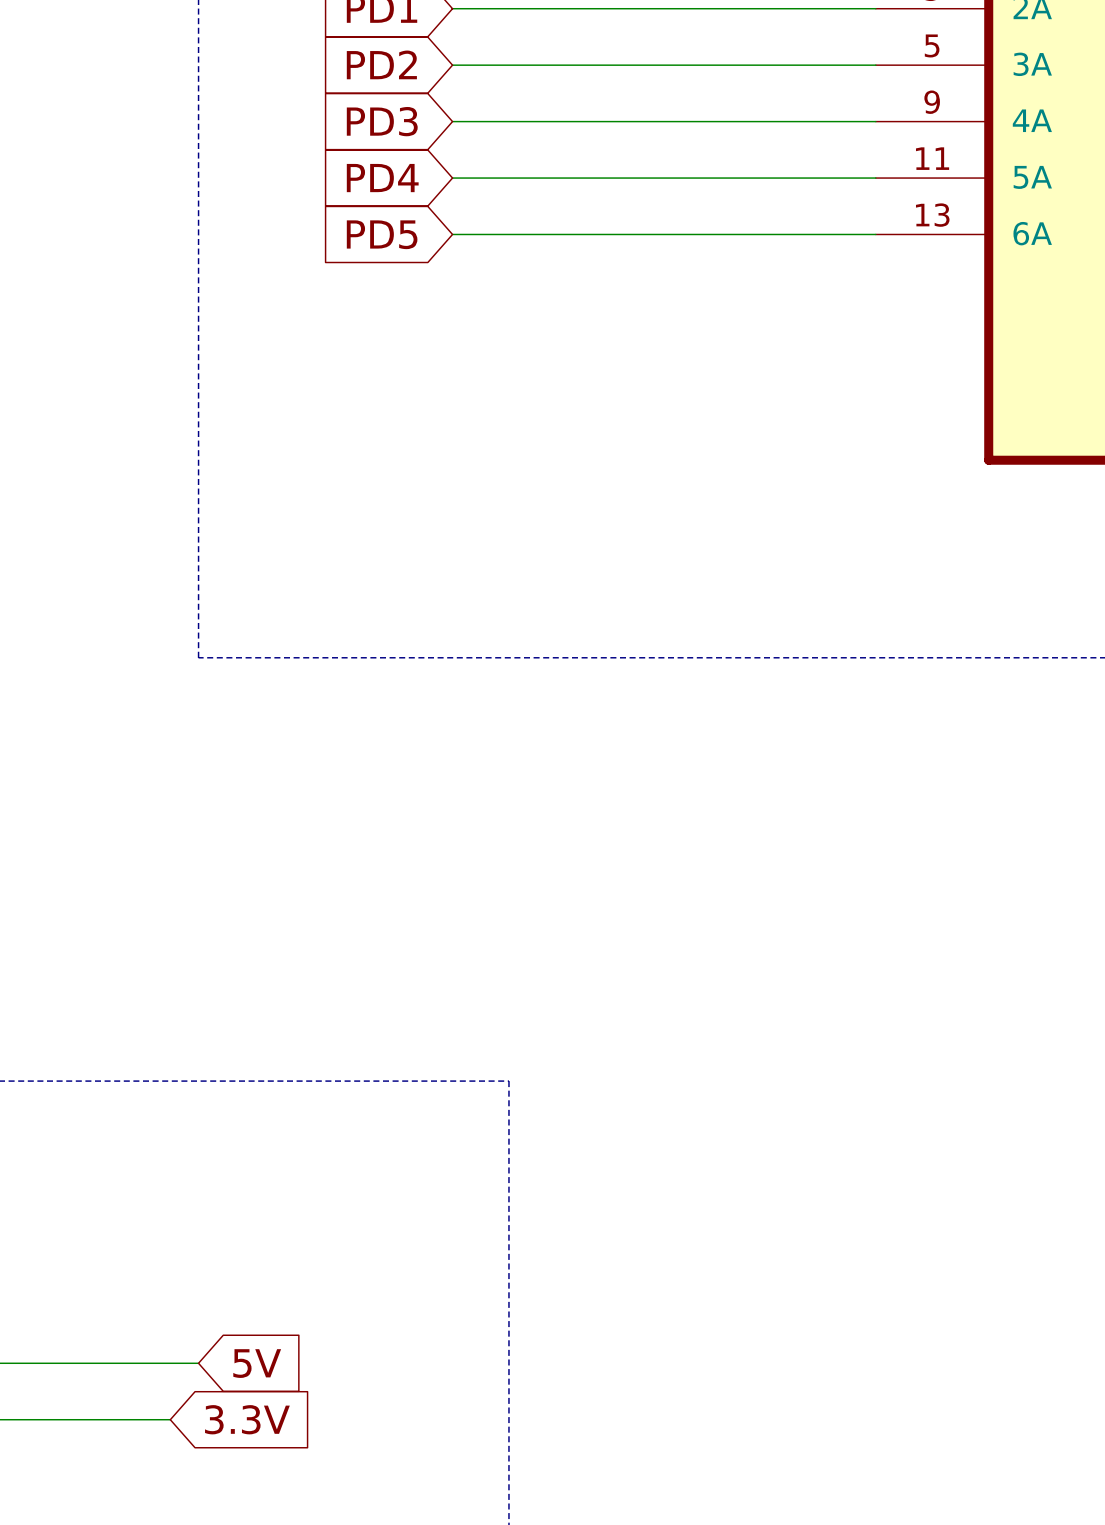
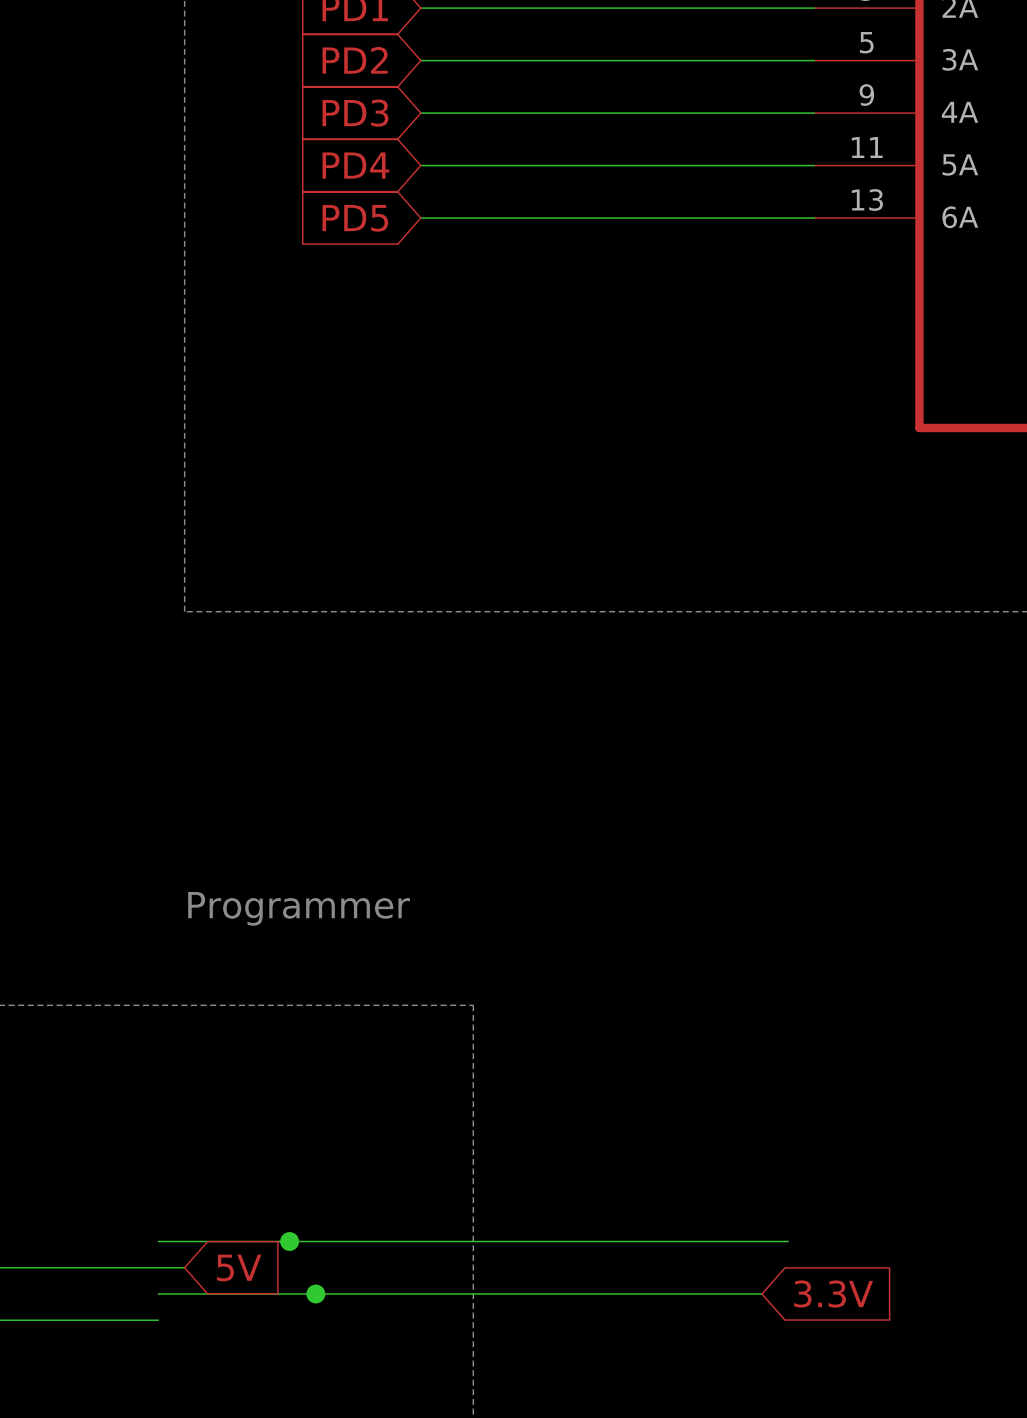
text: none -> Programmer (299, 908)
wire: none -> (158, 1241) (788, 1241)
junction: none -> (289, 1241)
wire: none -> (158, 1293) (761, 1293)
junction: none -> (315, 1293)
global label: none -> 3.3V (833, 1294)
global label: 3.3V (247, 1419) -> none

